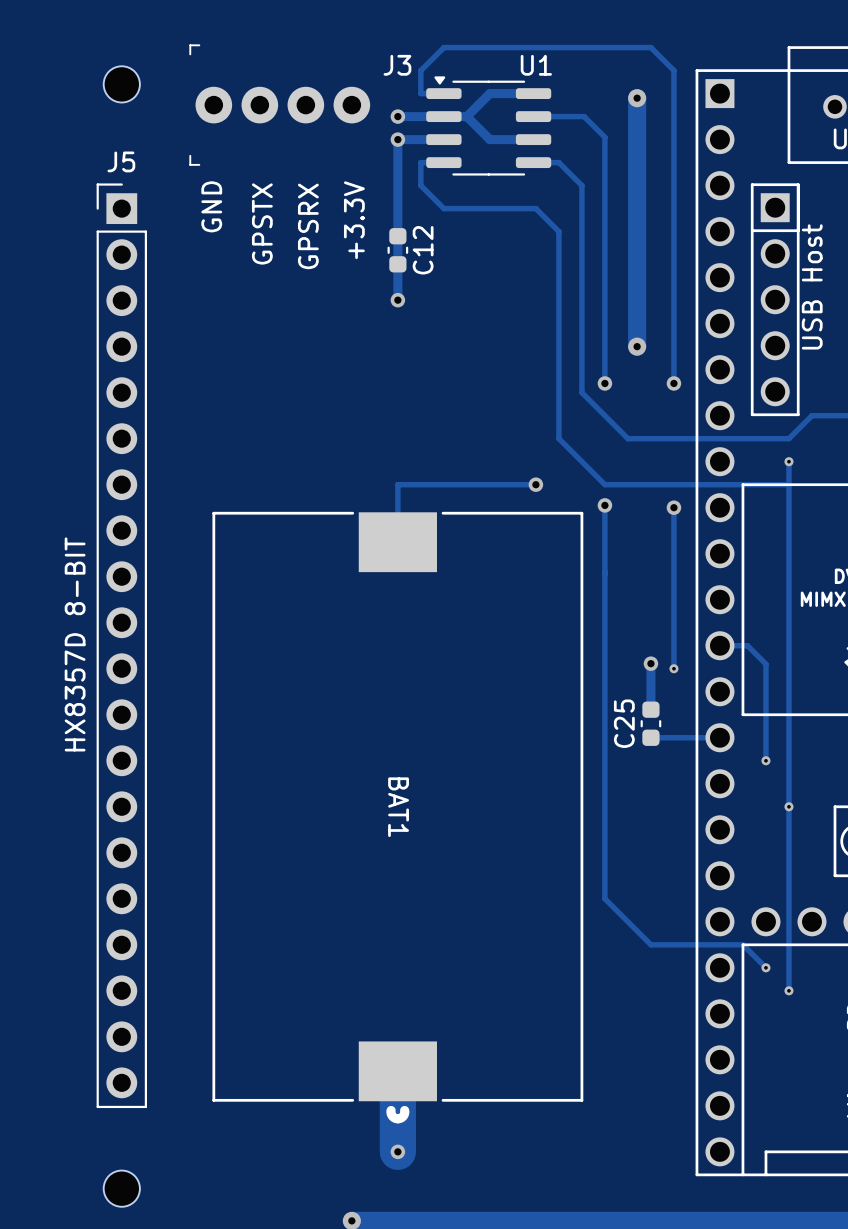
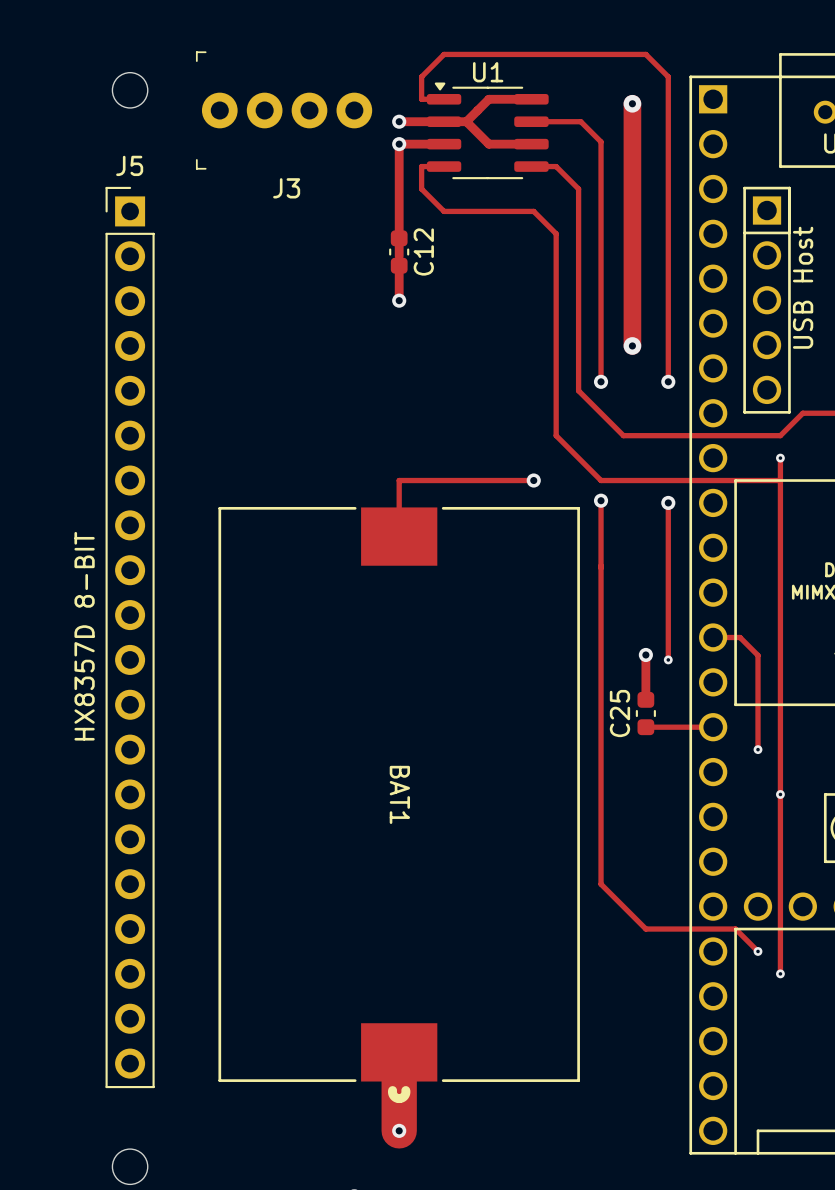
J3 name position: J3 (397, 65) -> J3 (286, 188)
U1 name position: U1 (536, 65) -> U1 (488, 72)
text: GND (211, 206) -> none
text: +3.3V (354, 220) -> none
text: GPSTX (262, 223) -> none
text: GPSRX (308, 226) -> none

